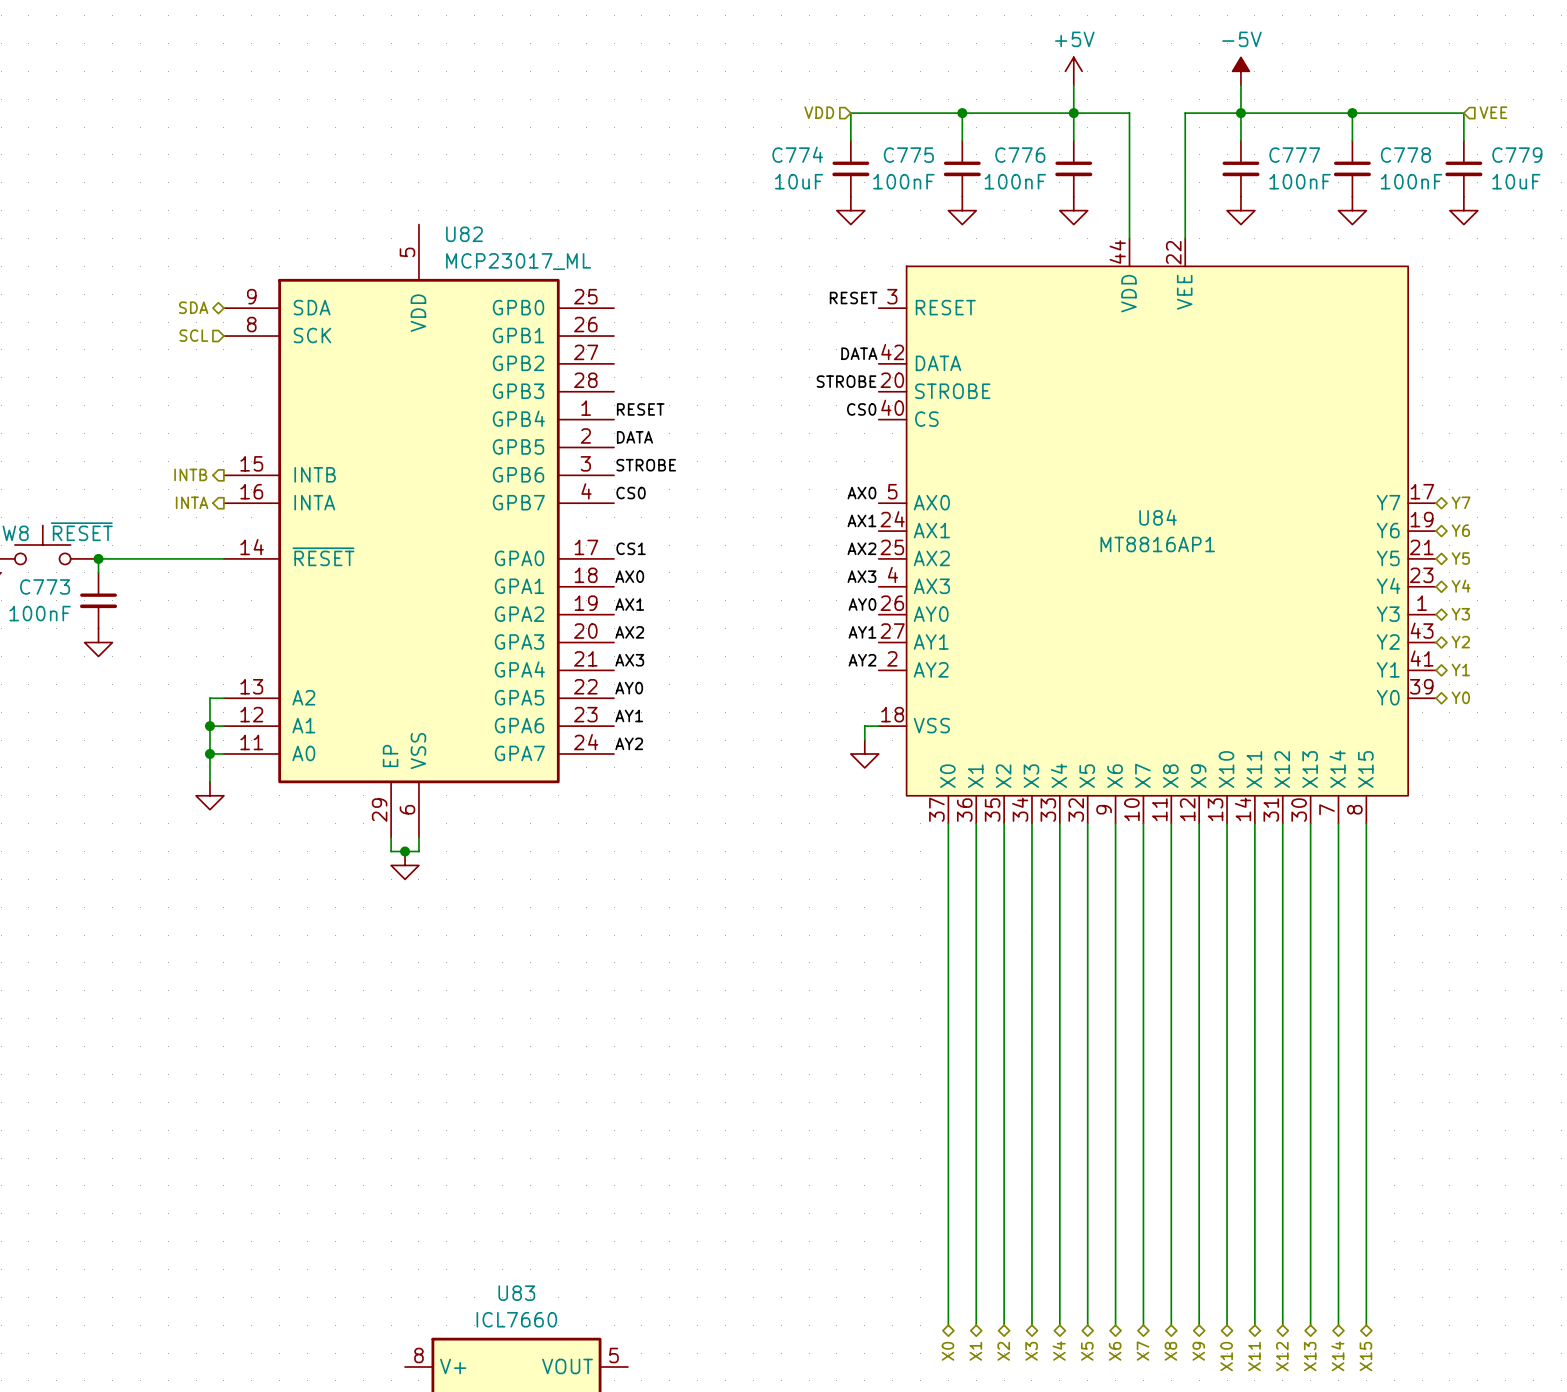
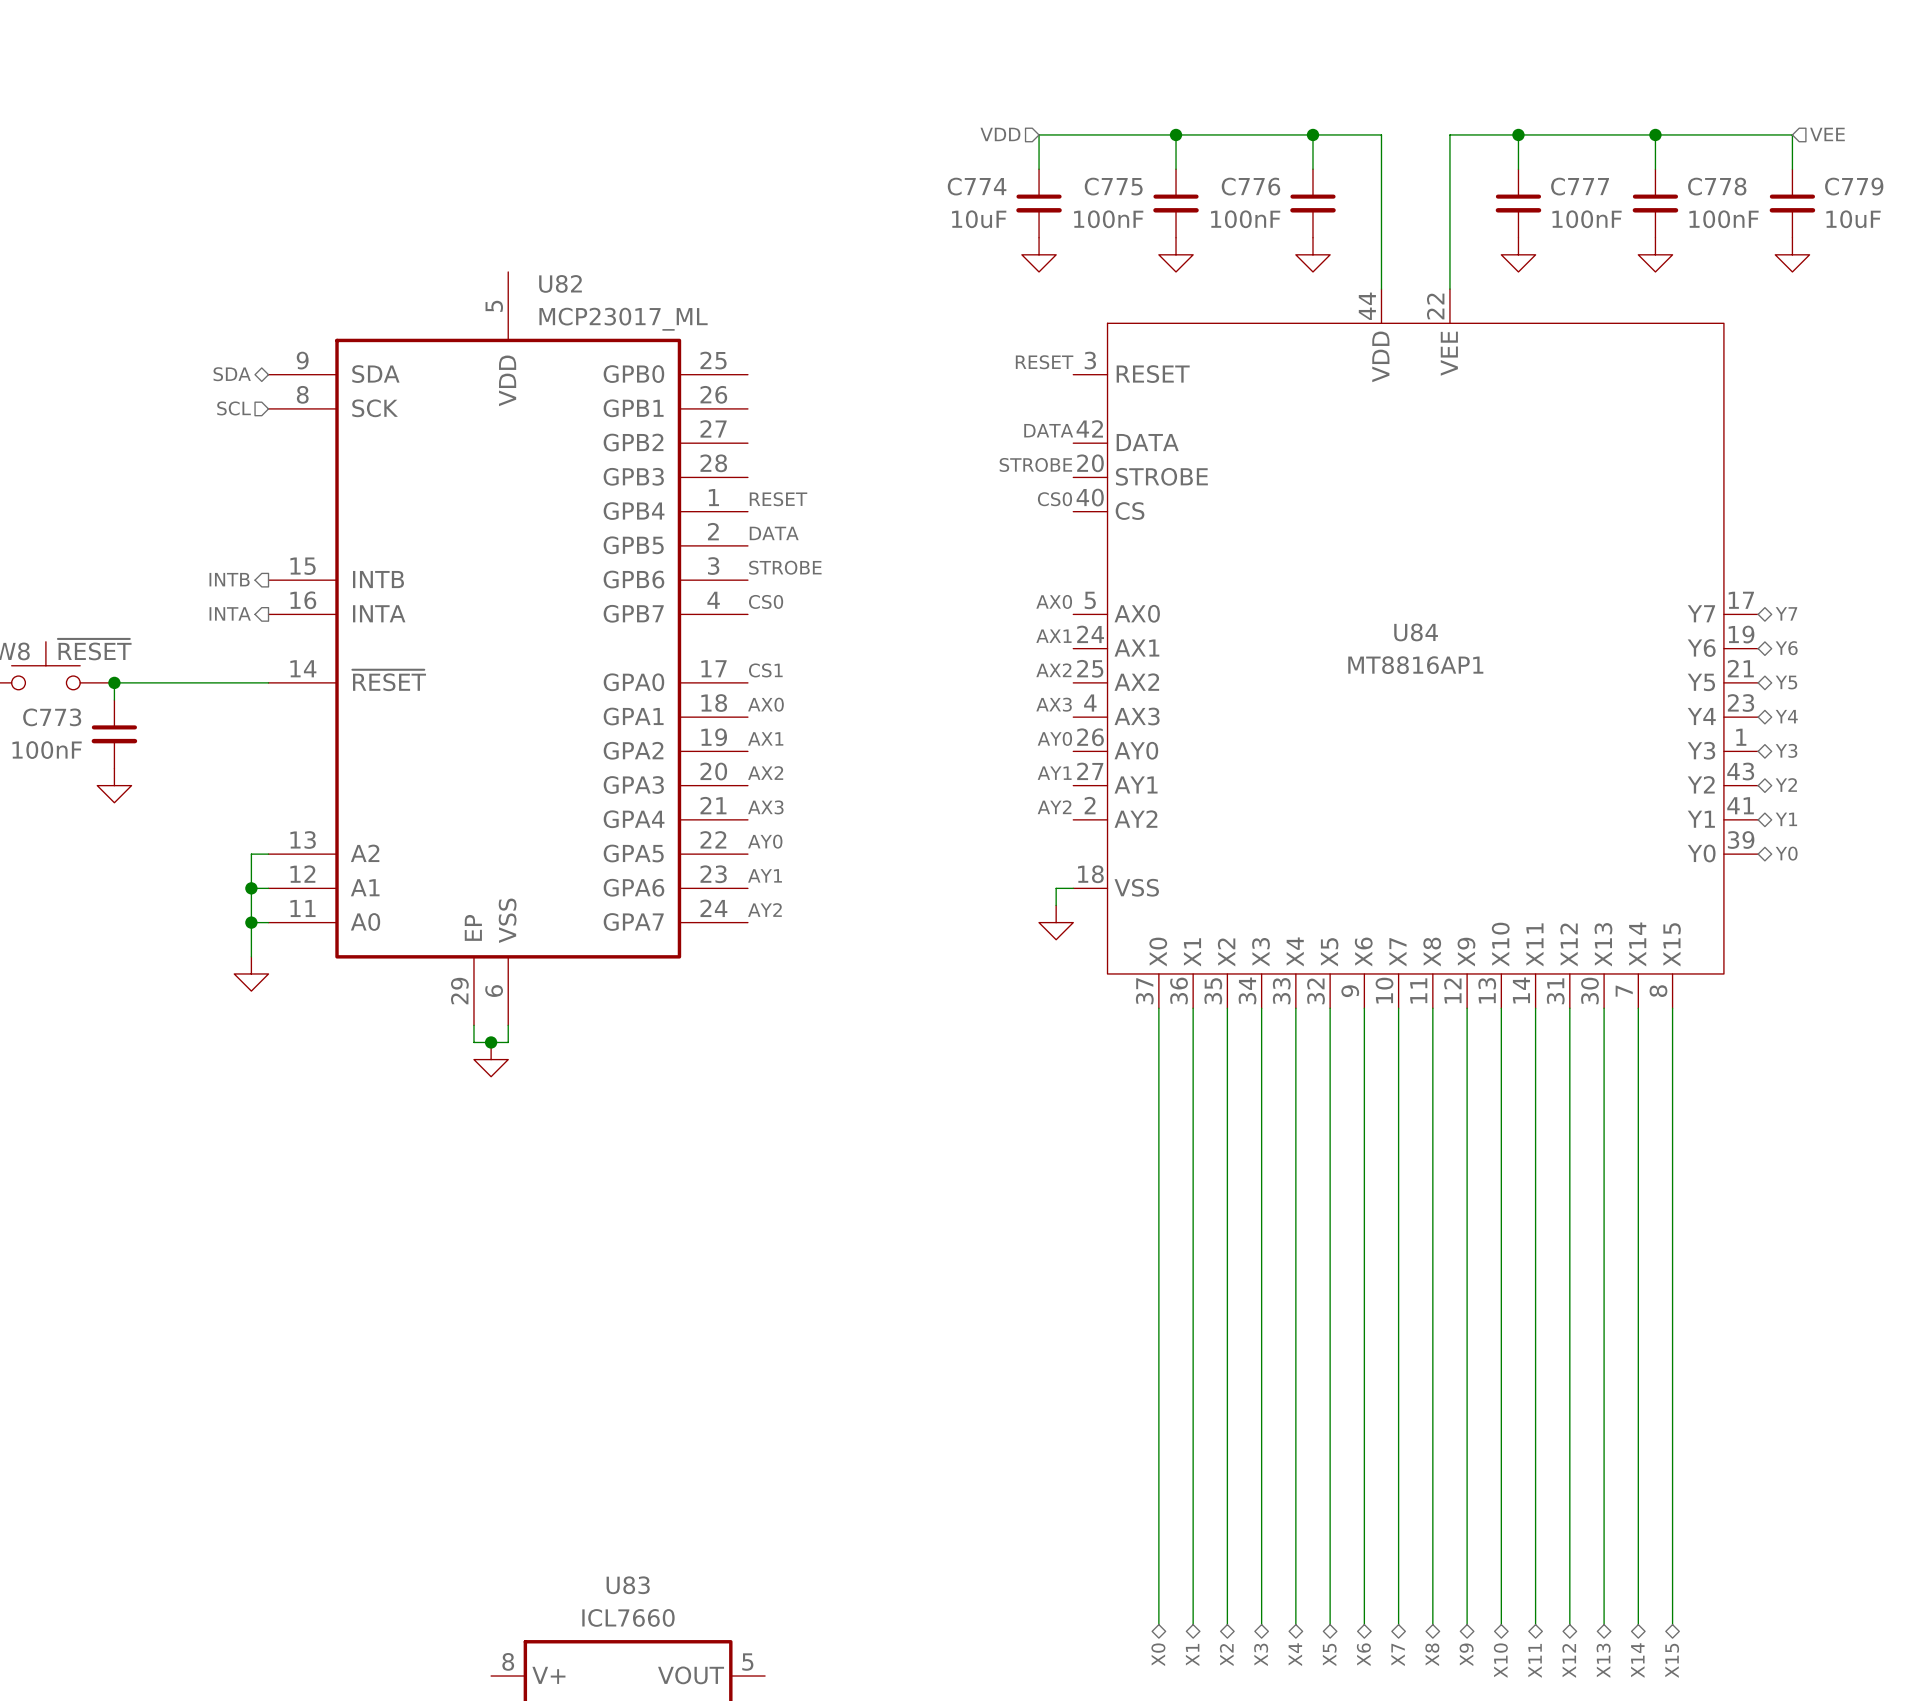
power symbol: +5V (1073, 71) -> none
power symbol: -5V (1240, 71) -> none
wire: (1073, 85) (1073, 113) -> none
wire: (1240, 85) (1240, 113) -> none

